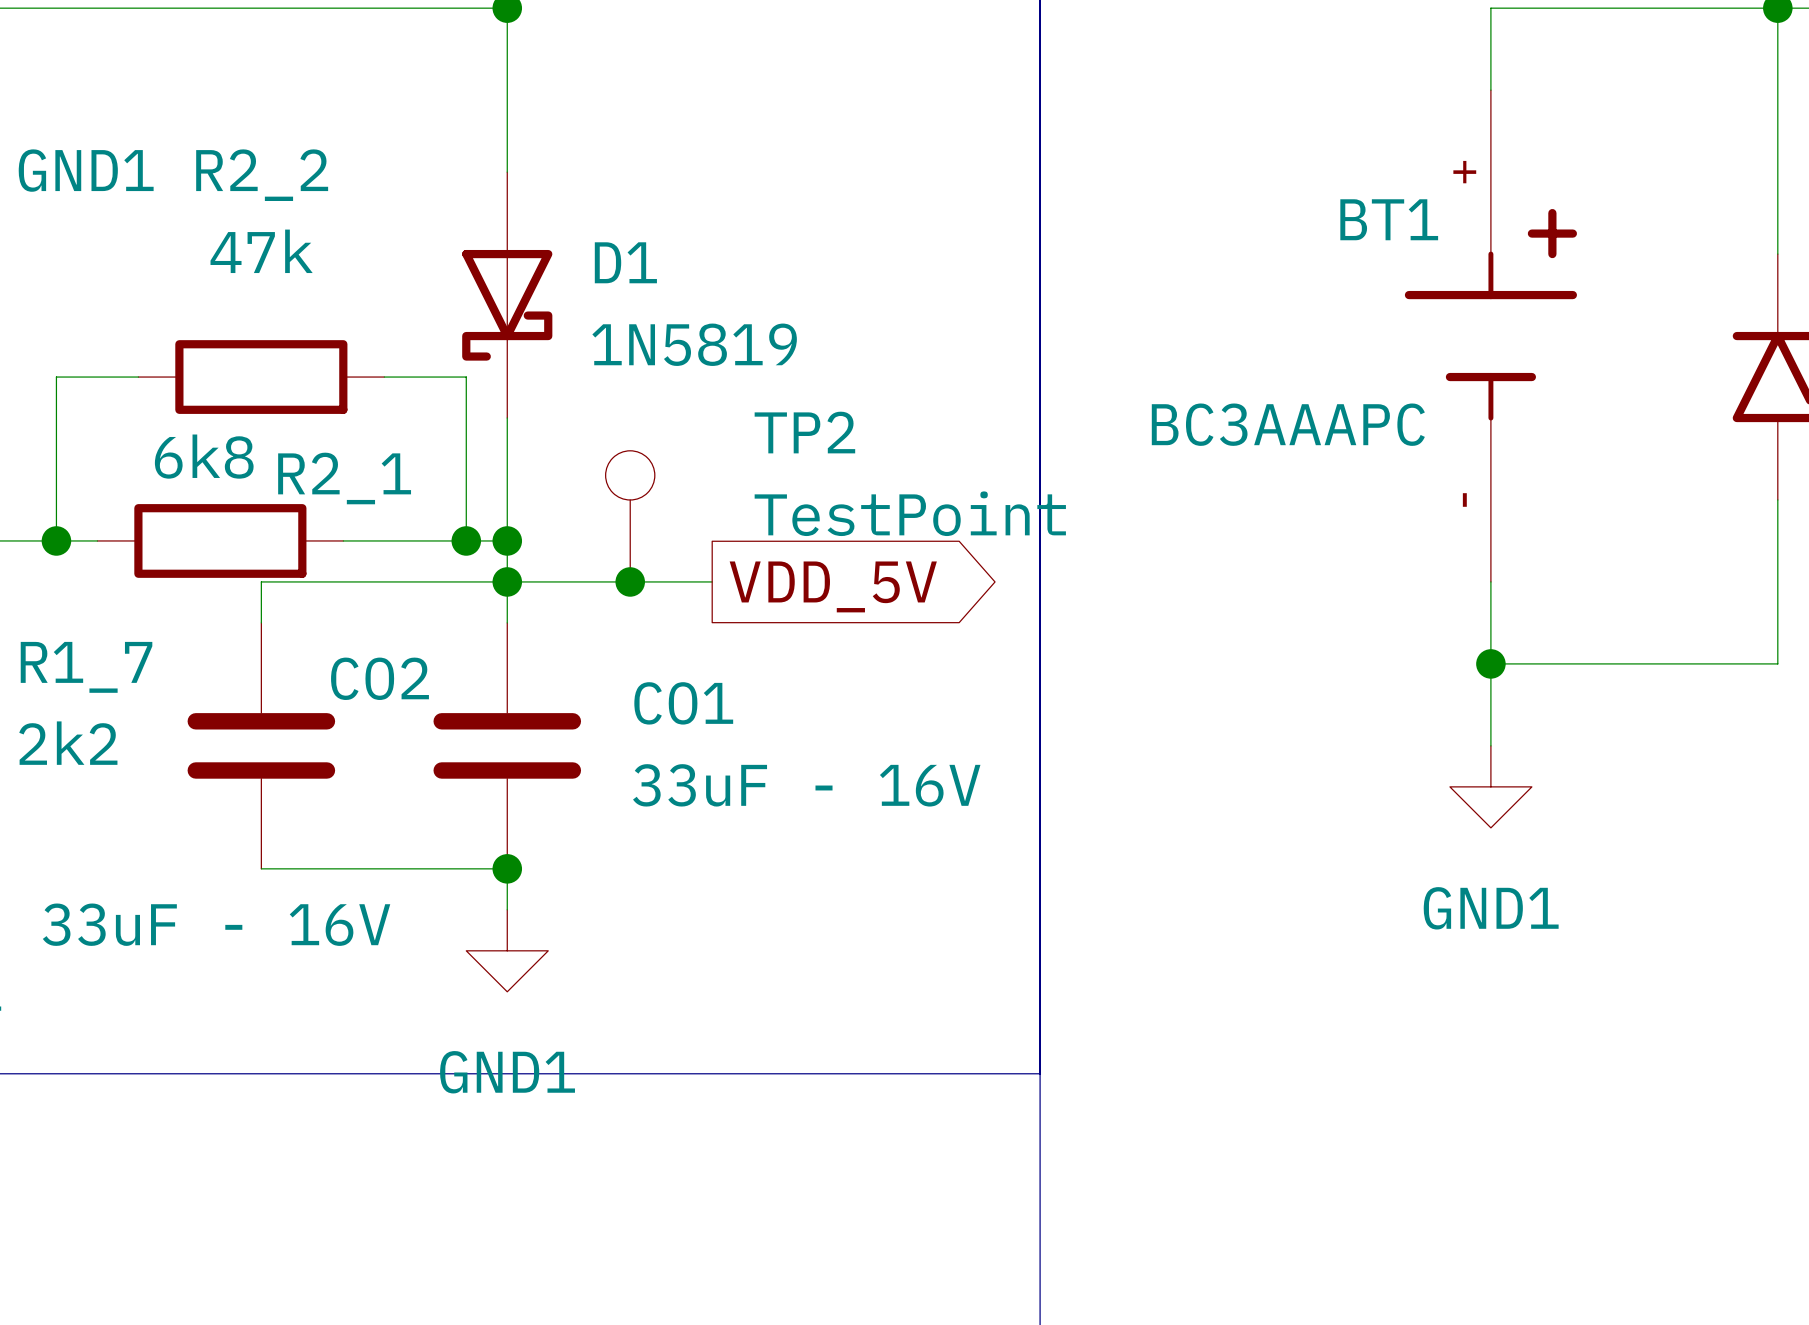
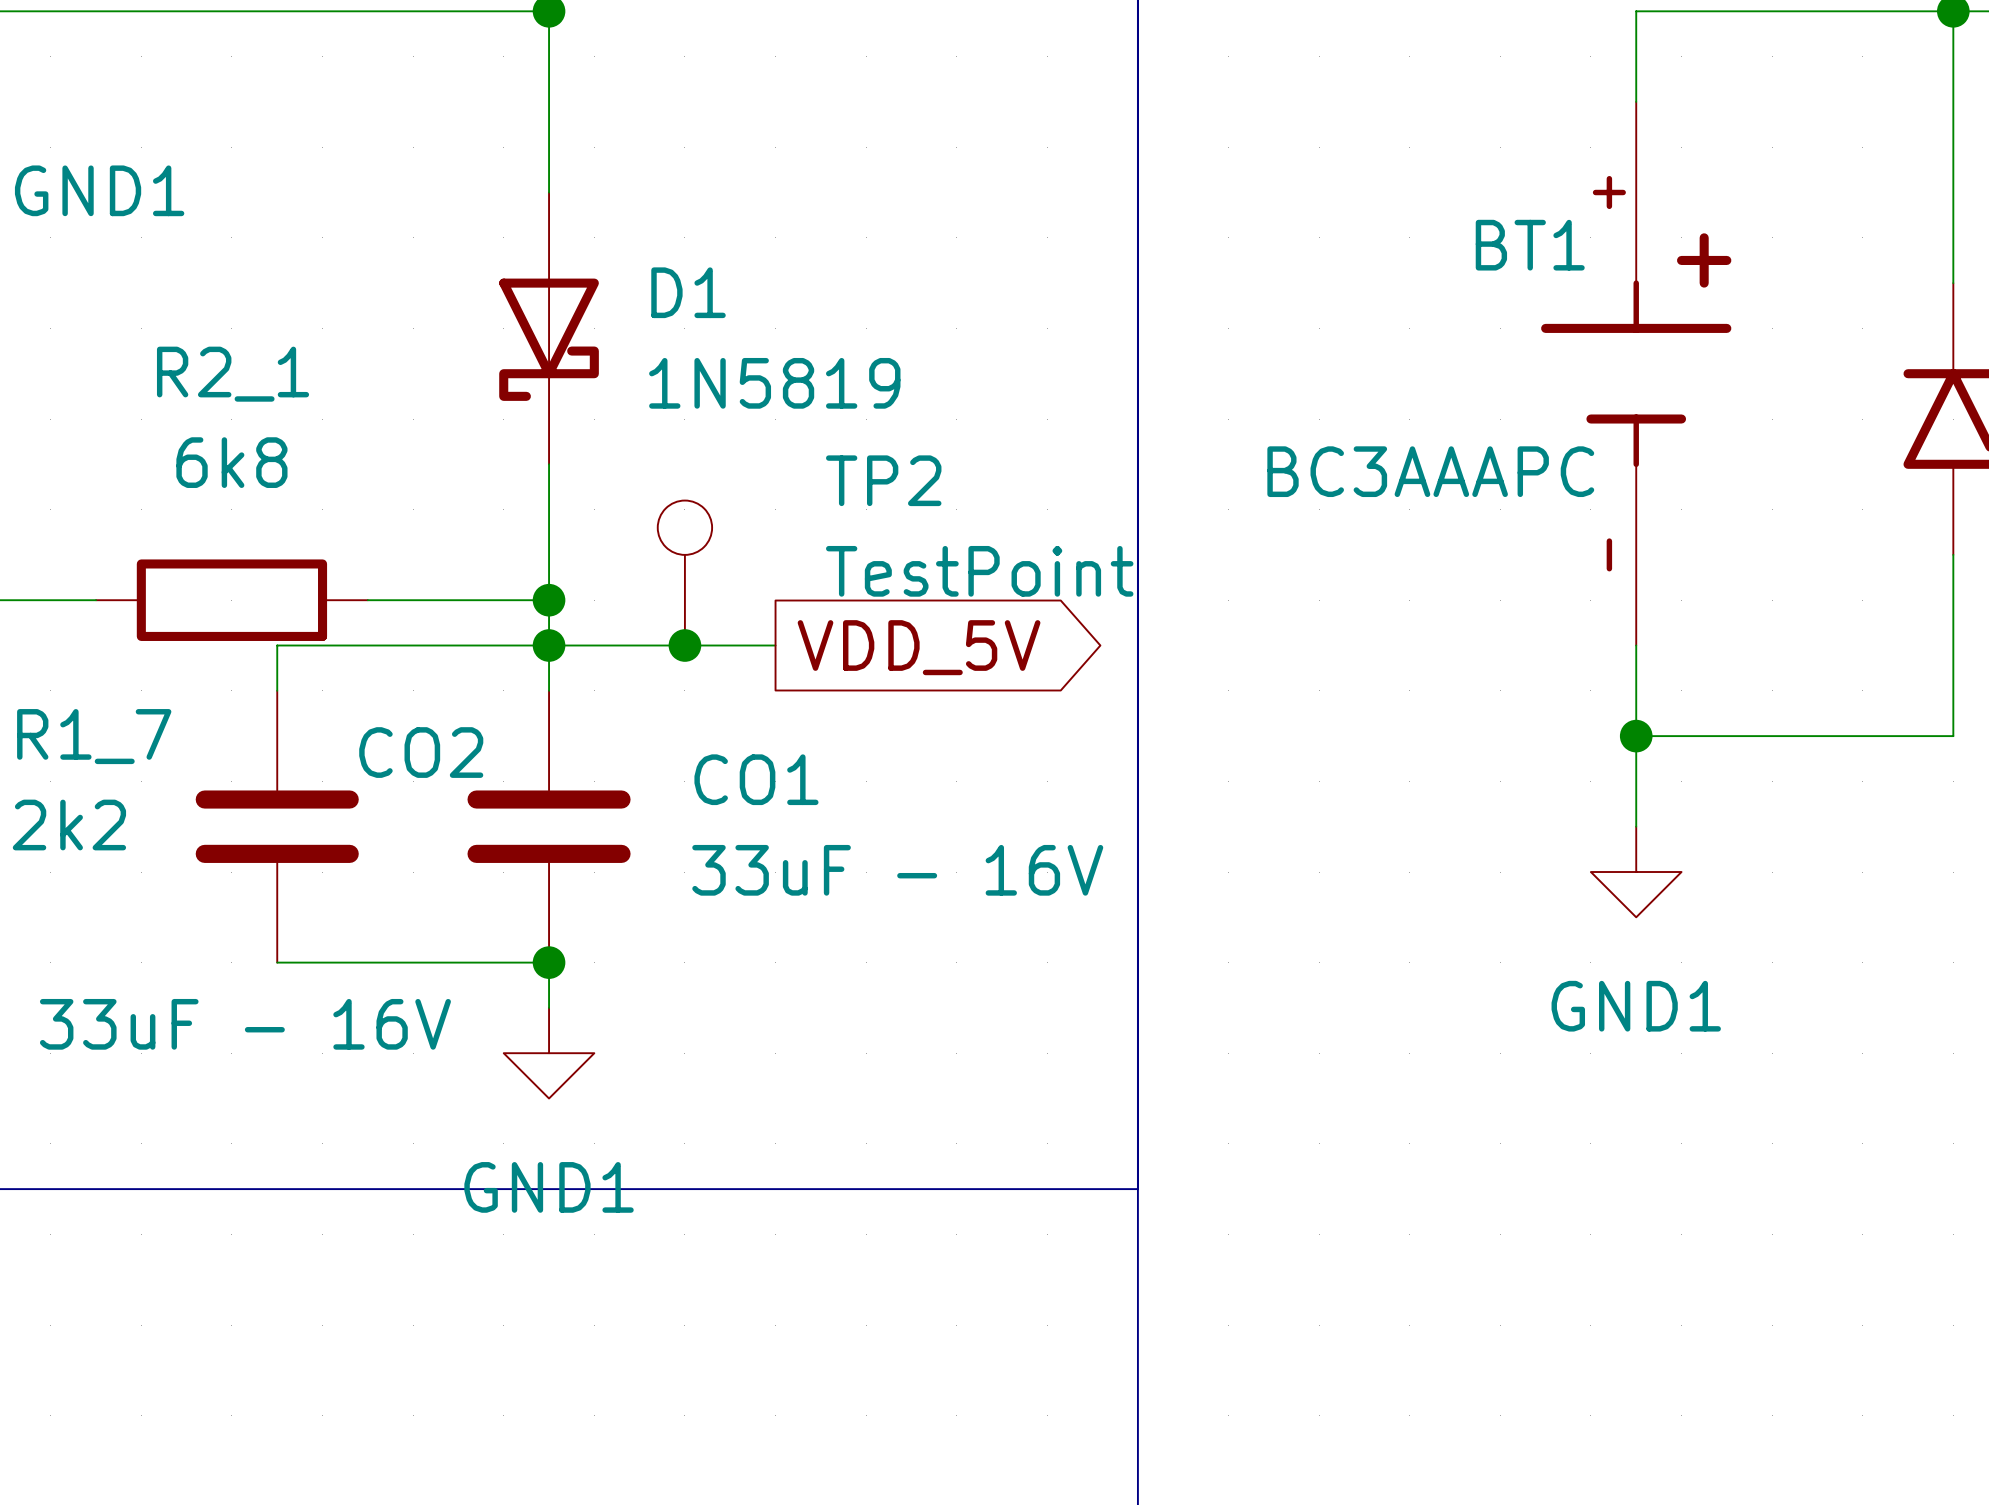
wire: (138, 377) (56, 377) (56, 540) -> none
R2_2: 47k (261, 377) -> none
wire: (384, 377) (466, 377) (466, 540) -> none
R2_1 value position: 6k8 (204, 456) -> 6k8 (231, 462)
R2_1 name position: R2_1 (344, 478) -> R2_1 (233, 374)
junction: (56, 540) -> none
junction: (466, 540) -> none

